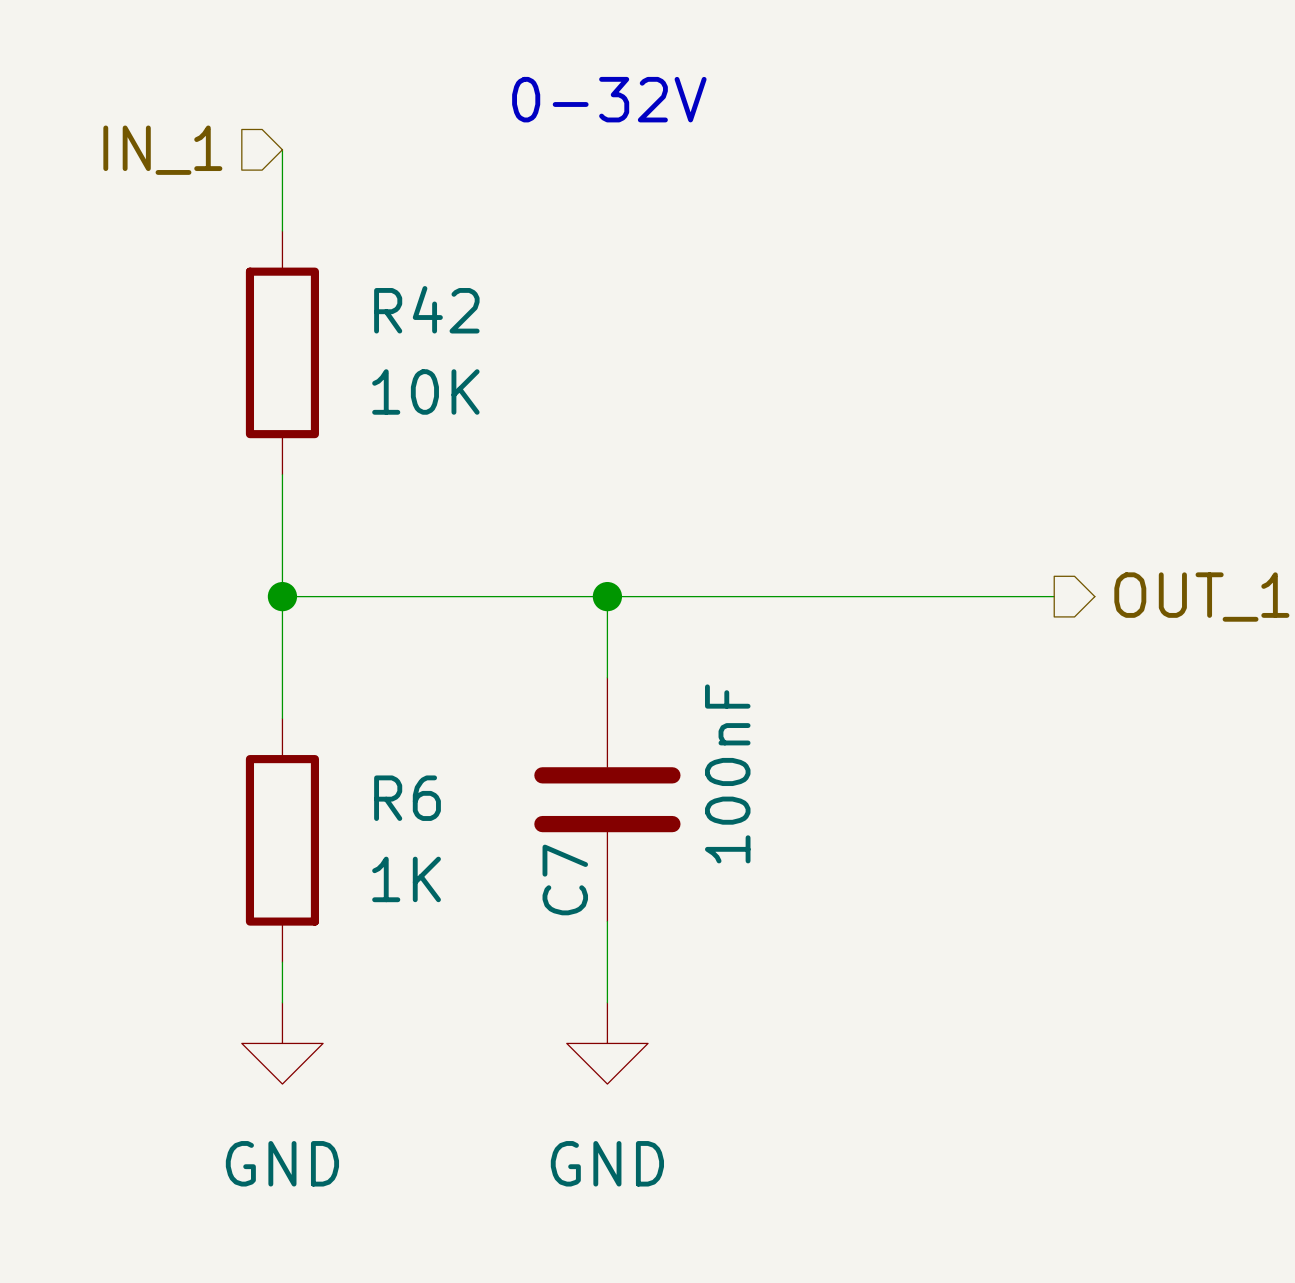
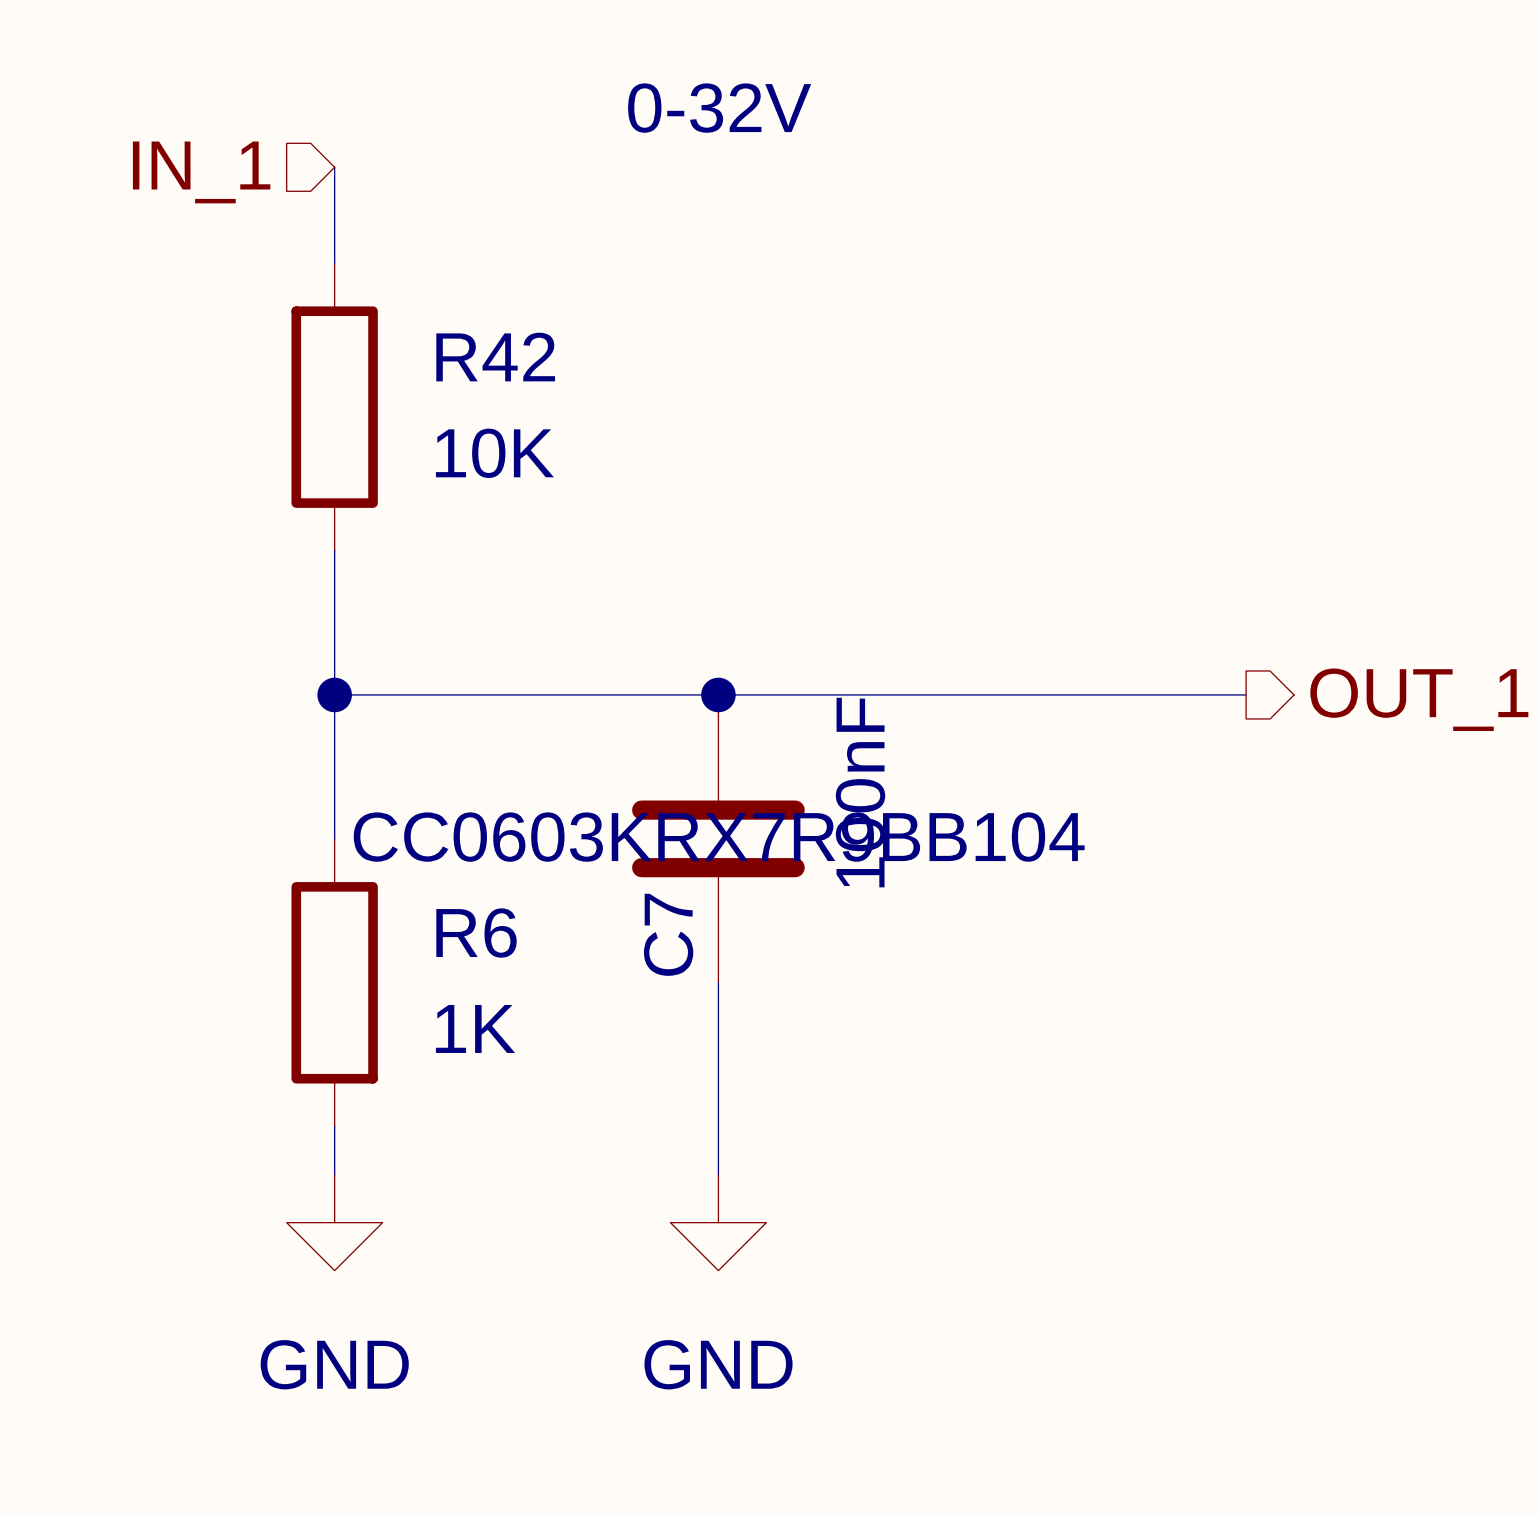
C7 text: none -> CC0603KRX7R9BB104 (719, 837)
C7 position: (607, 799) -> (718, 838)

